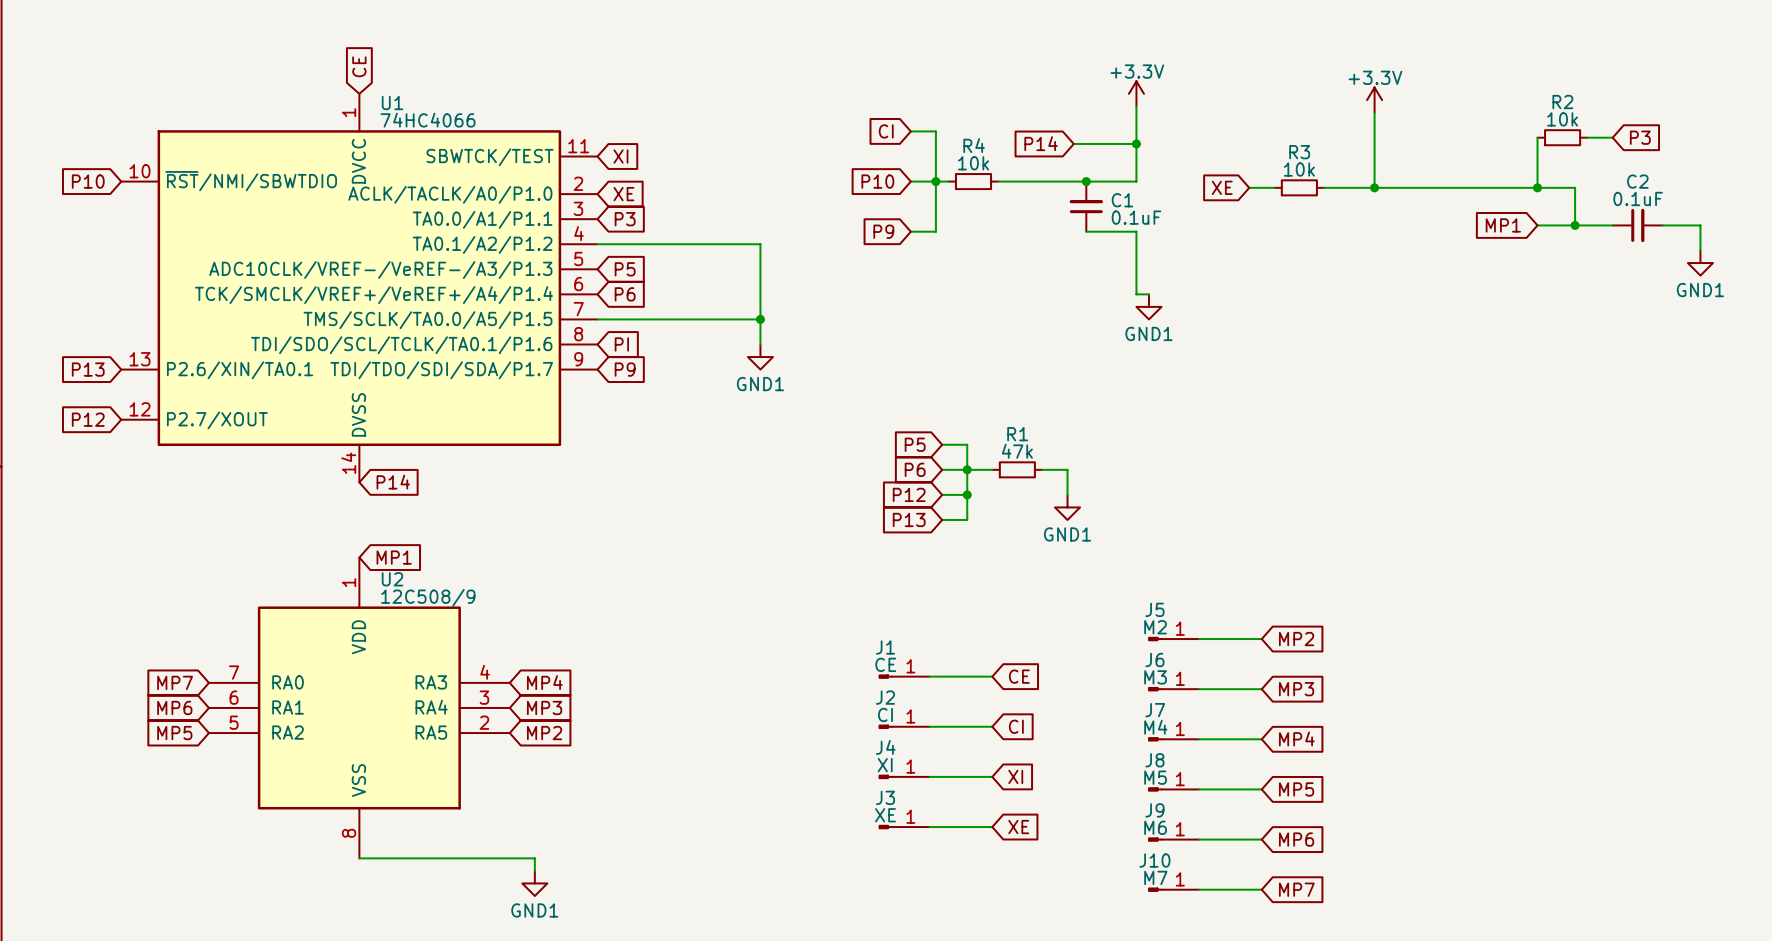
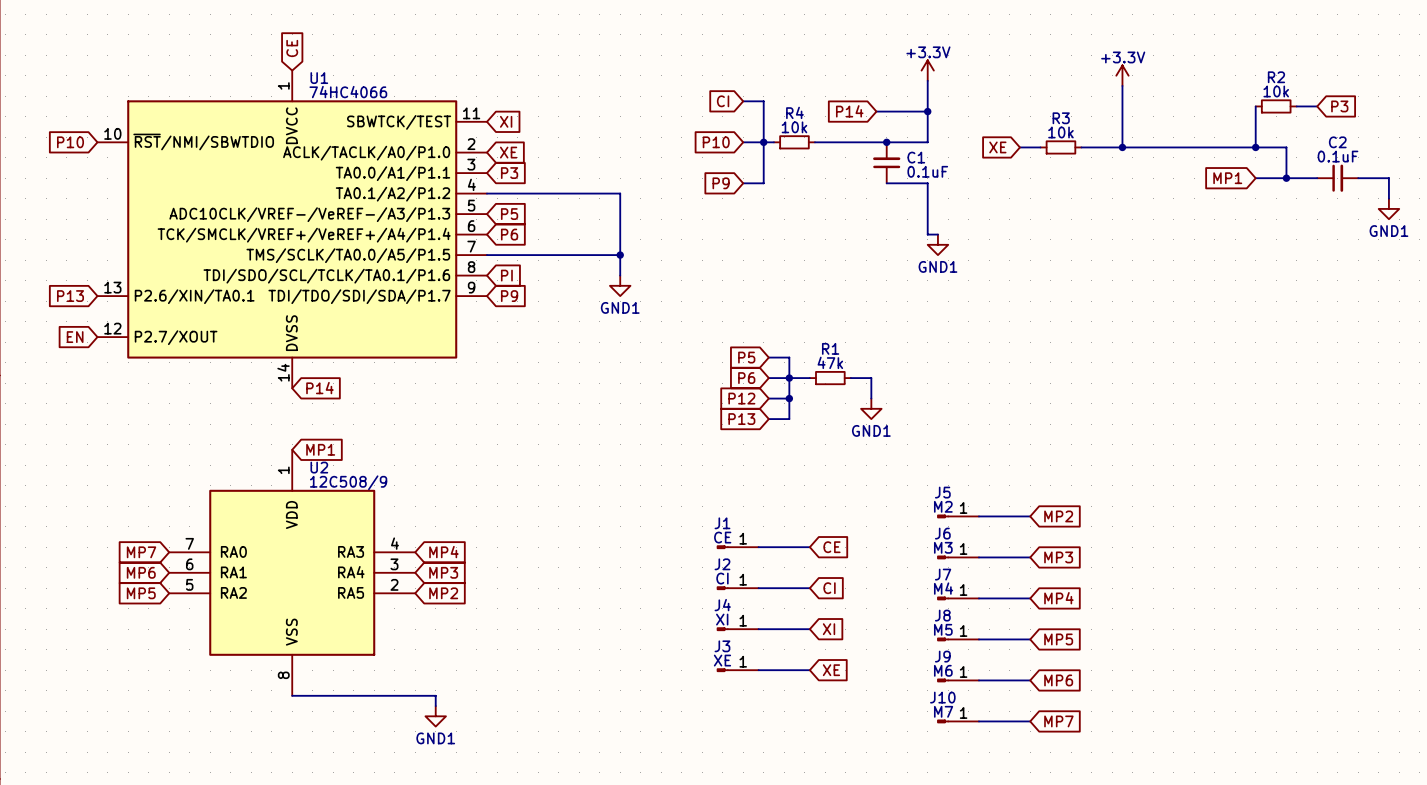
global label: P12 (88, 419) -> EN (75, 337)

